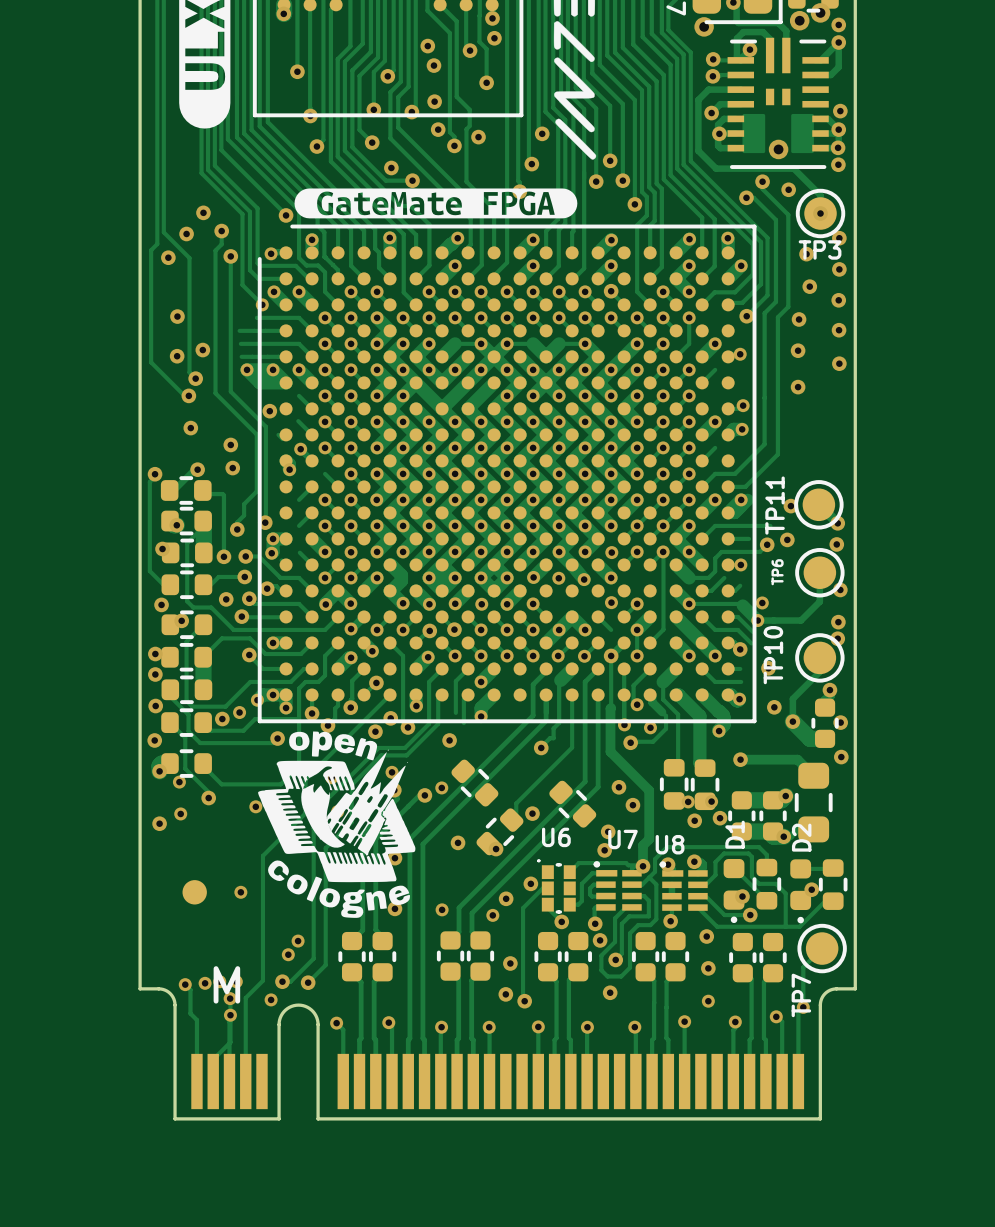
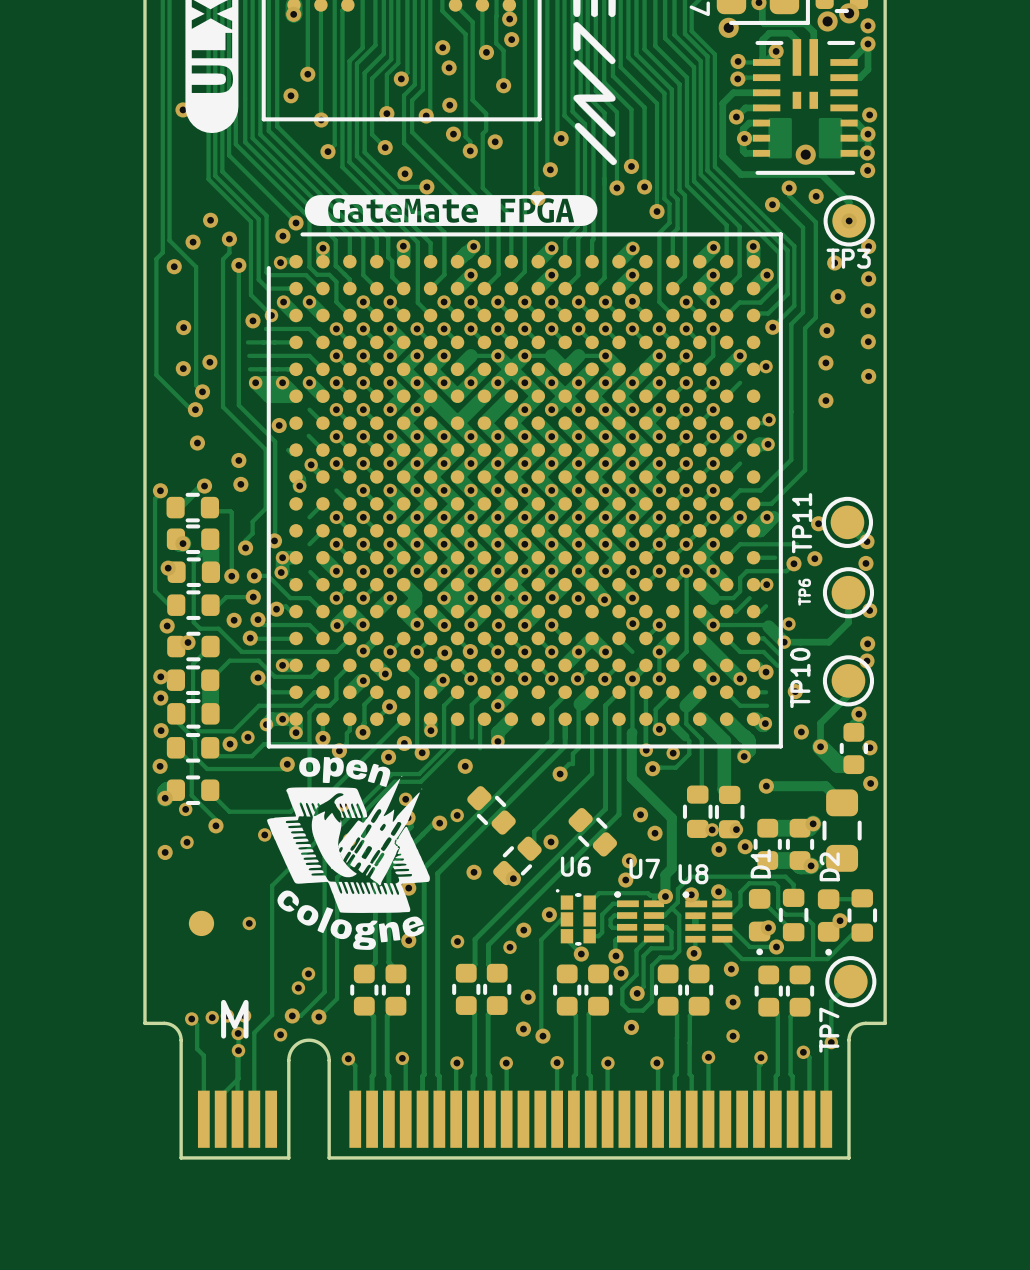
via: none -> (290, 95)
via: none -> (182, 109)
via: none -> (282, 236)
via: none -> (252, 320)

